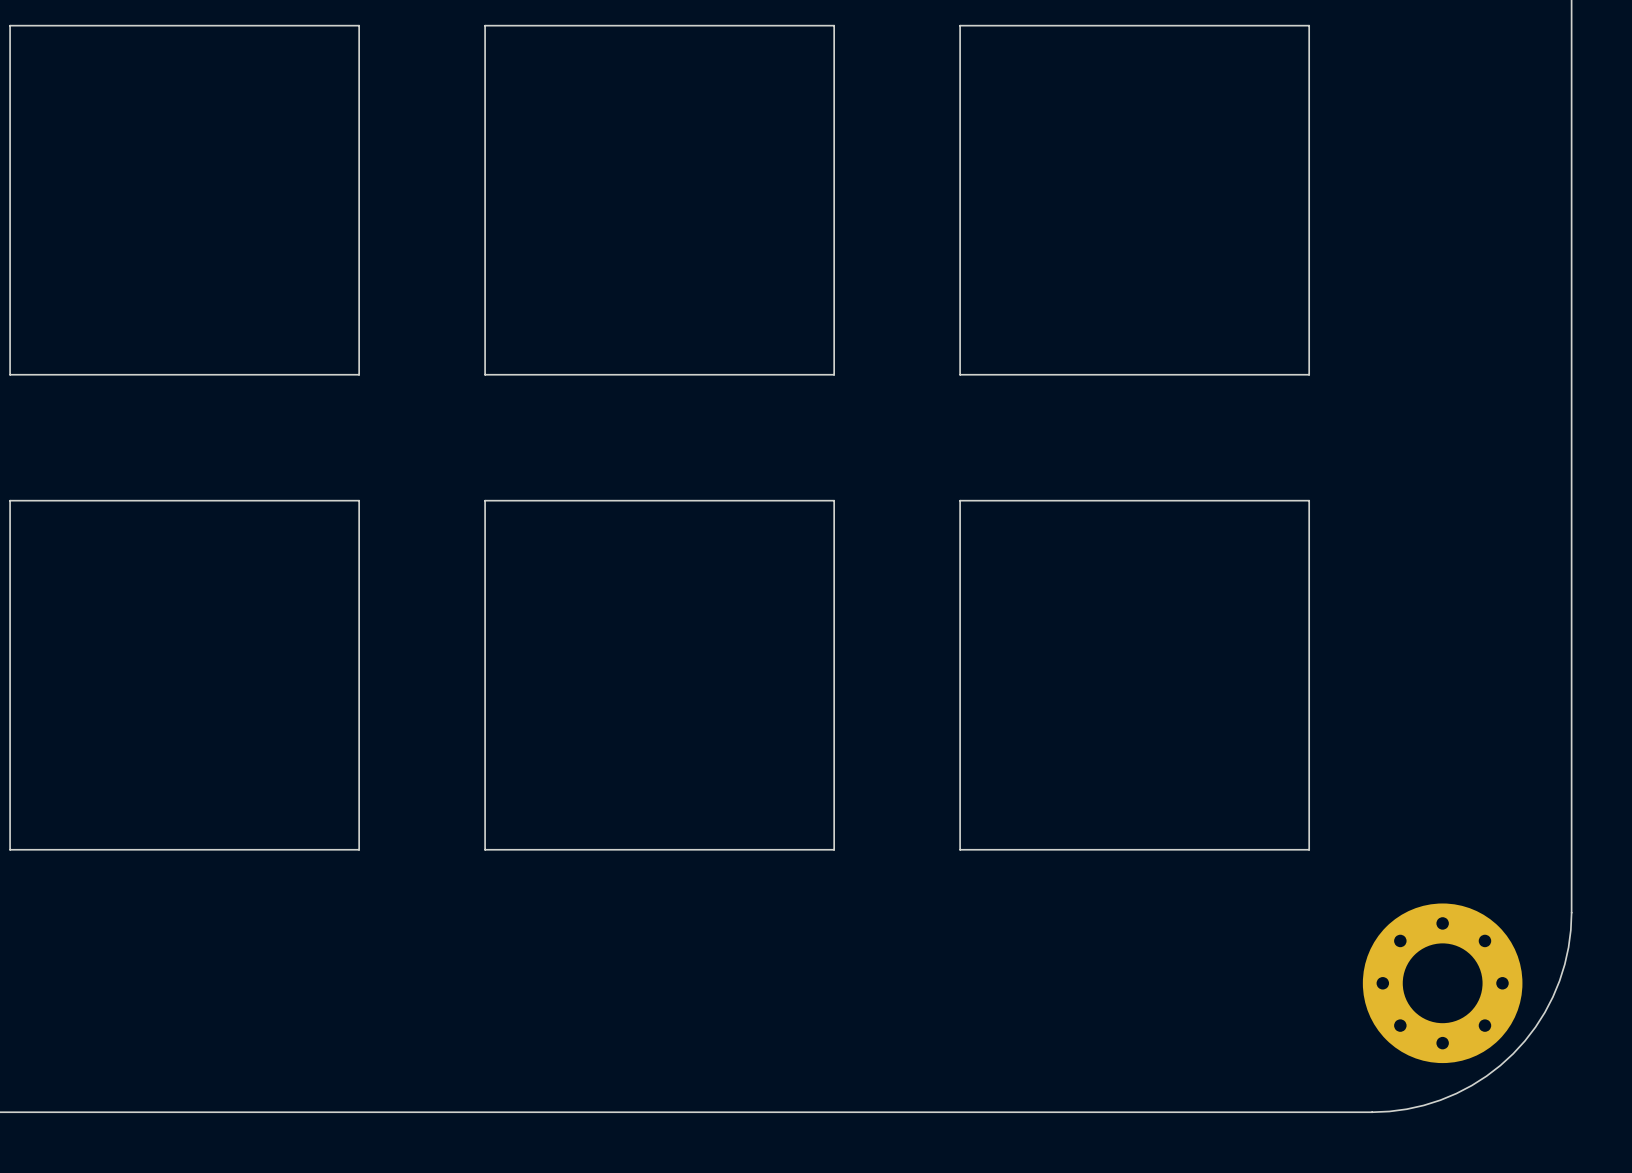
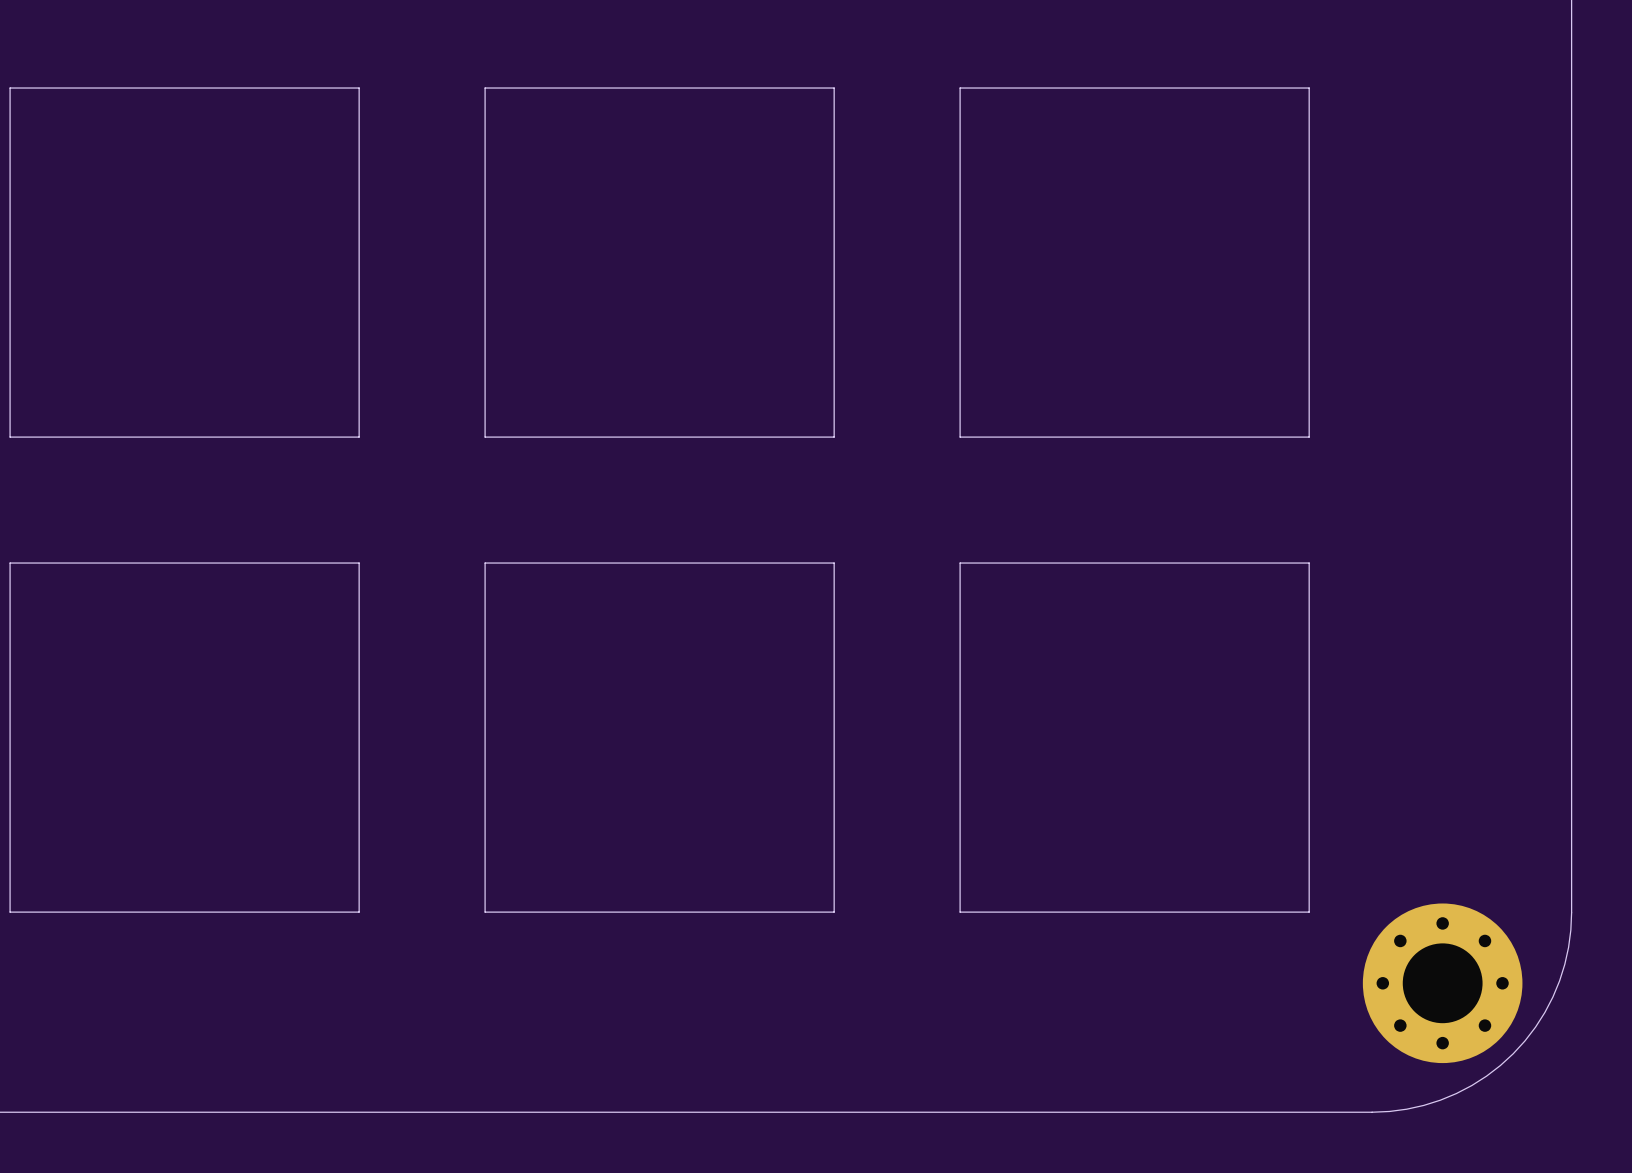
board edge: (359, 88) (359, 25) (10, 25) (10, 88) -> (359, 88) (10, 88)
board edge: (834, 88) (834, 25) (485, 25) (485, 88) -> (834, 88) (485, 88)
board edge: (1309, 88) (1309, 25) (960, 25) (960, 88) -> (1309, 88) (960, 88)
board edge: (359, 374) (10, 374) -> (359, 374) (359, 437) (10, 437) (10, 374)
board edge: (834, 374) (485, 374) -> (834, 374) (834, 437) (485, 437) (485, 374)
board edge: (1309, 374) (960, 374) -> (1309, 374) (1309, 437) (960, 437) (960, 374)
board edge: (359, 563) (359, 500) (10, 500) (10, 563) -> (359, 563) (10, 563)
board edge: (834, 563) (834, 500) (485, 500) (485, 563) -> (834, 563) (485, 563)
board edge: (1309, 563) (1309, 500) (960, 500) (960, 563) -> (1309, 563) (960, 563)
board edge: (359, 849) (10, 849) -> (359, 849) (359, 912) (10, 912) (10, 849)
board edge: (834, 849) (485, 849) -> (834, 849) (834, 912) (485, 912) (485, 849)
board edge: (1309, 849) (960, 849) -> (1309, 849) (1309, 912) (960, 912) (960, 849)

